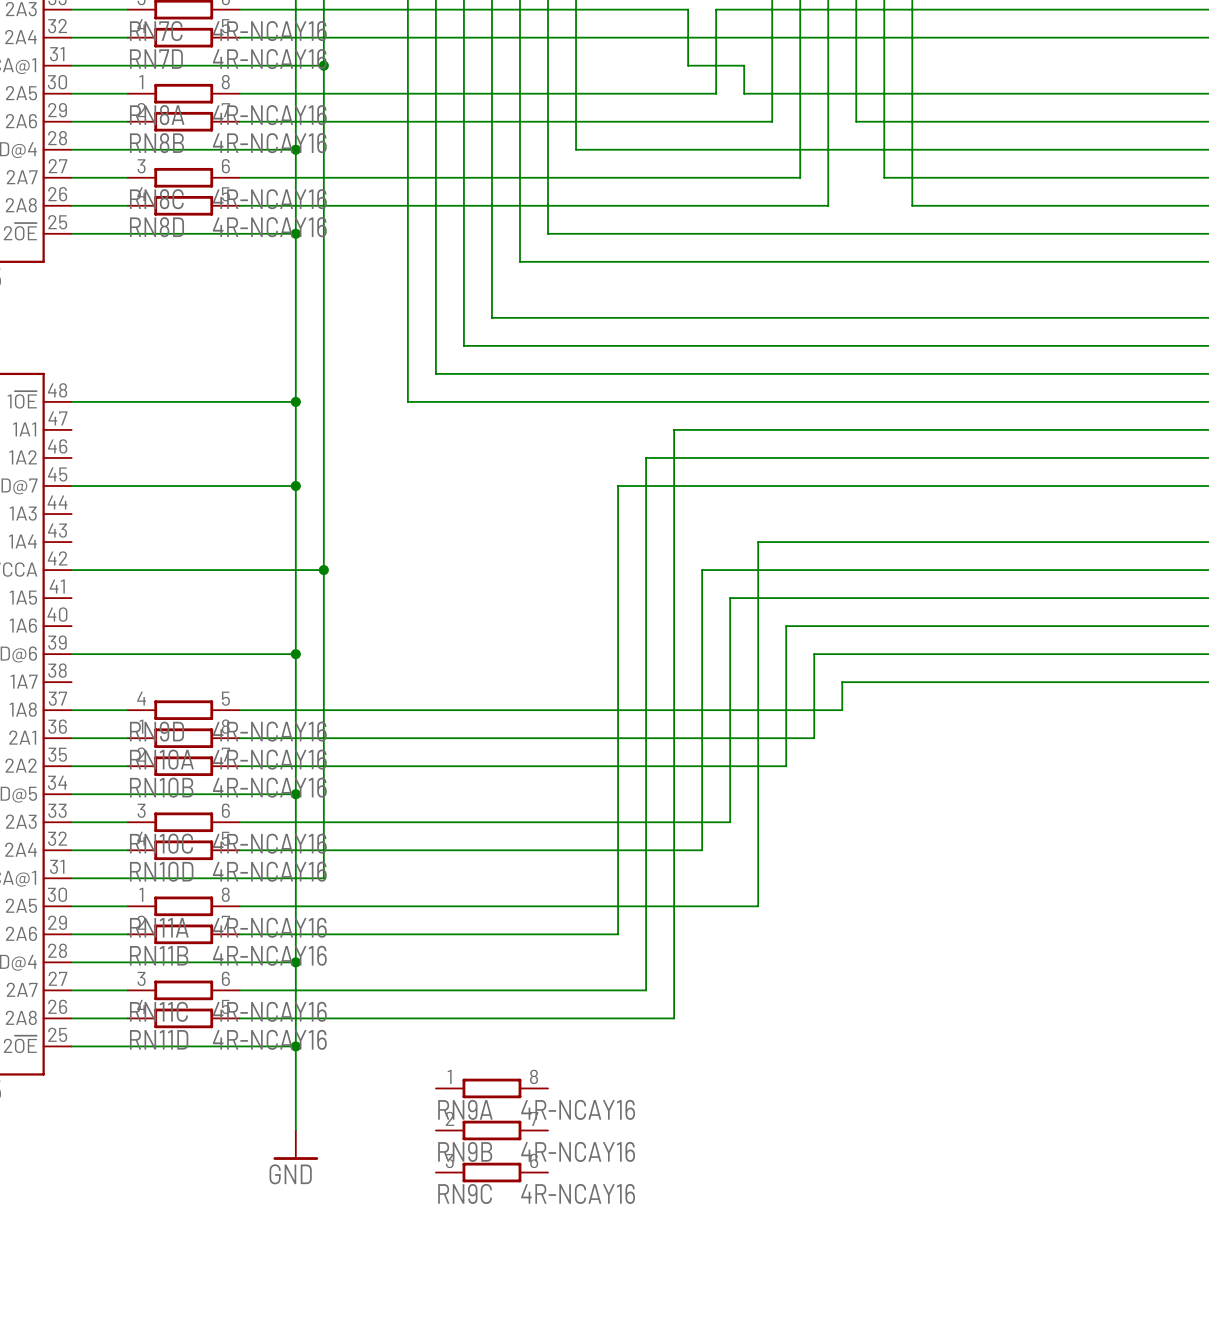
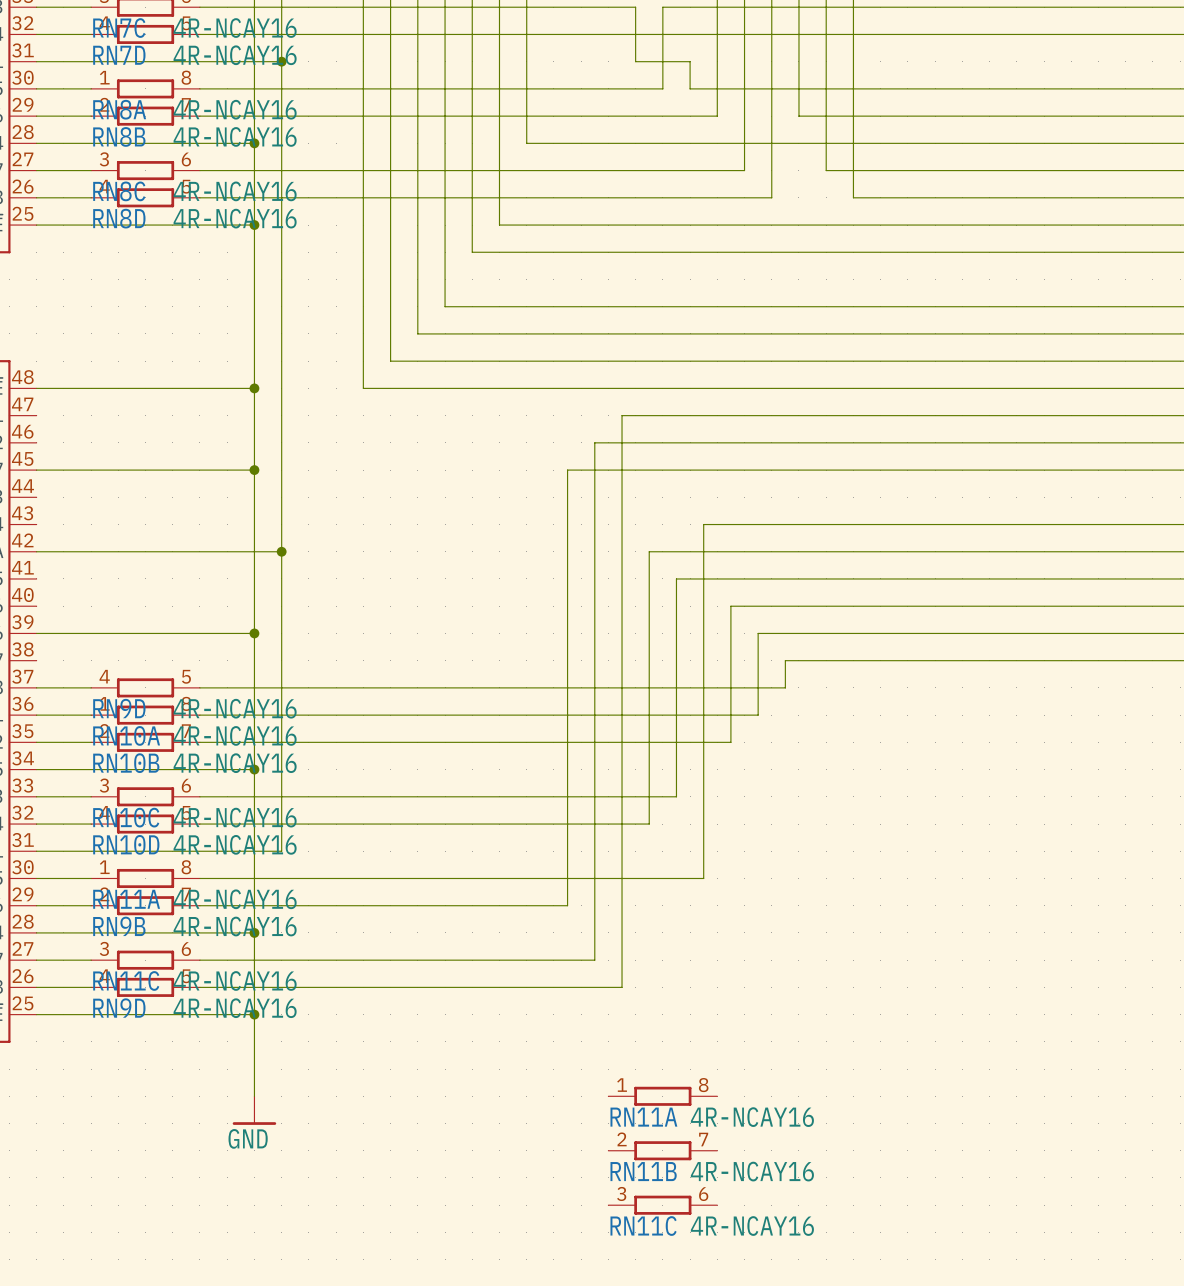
RN11B name: RN11B (159, 955) -> RN9B (119, 926)
RN11D name: RN11D (159, 1039) -> RN9D (119, 1008)
RN9A: 4R-NCAY16 (491, 1088) -> none
RN9B: 4R-NCAY16 (491, 1130) -> none
RN11A: none -> 4R-NCAY16 (662, 1096)
RN9C: 4R-NCAY16 (491, 1172) -> none
RN11B: none -> 4R-NCAY16 (662, 1150)
RN11C: none -> 4R-NCAY16 (662, 1205)

